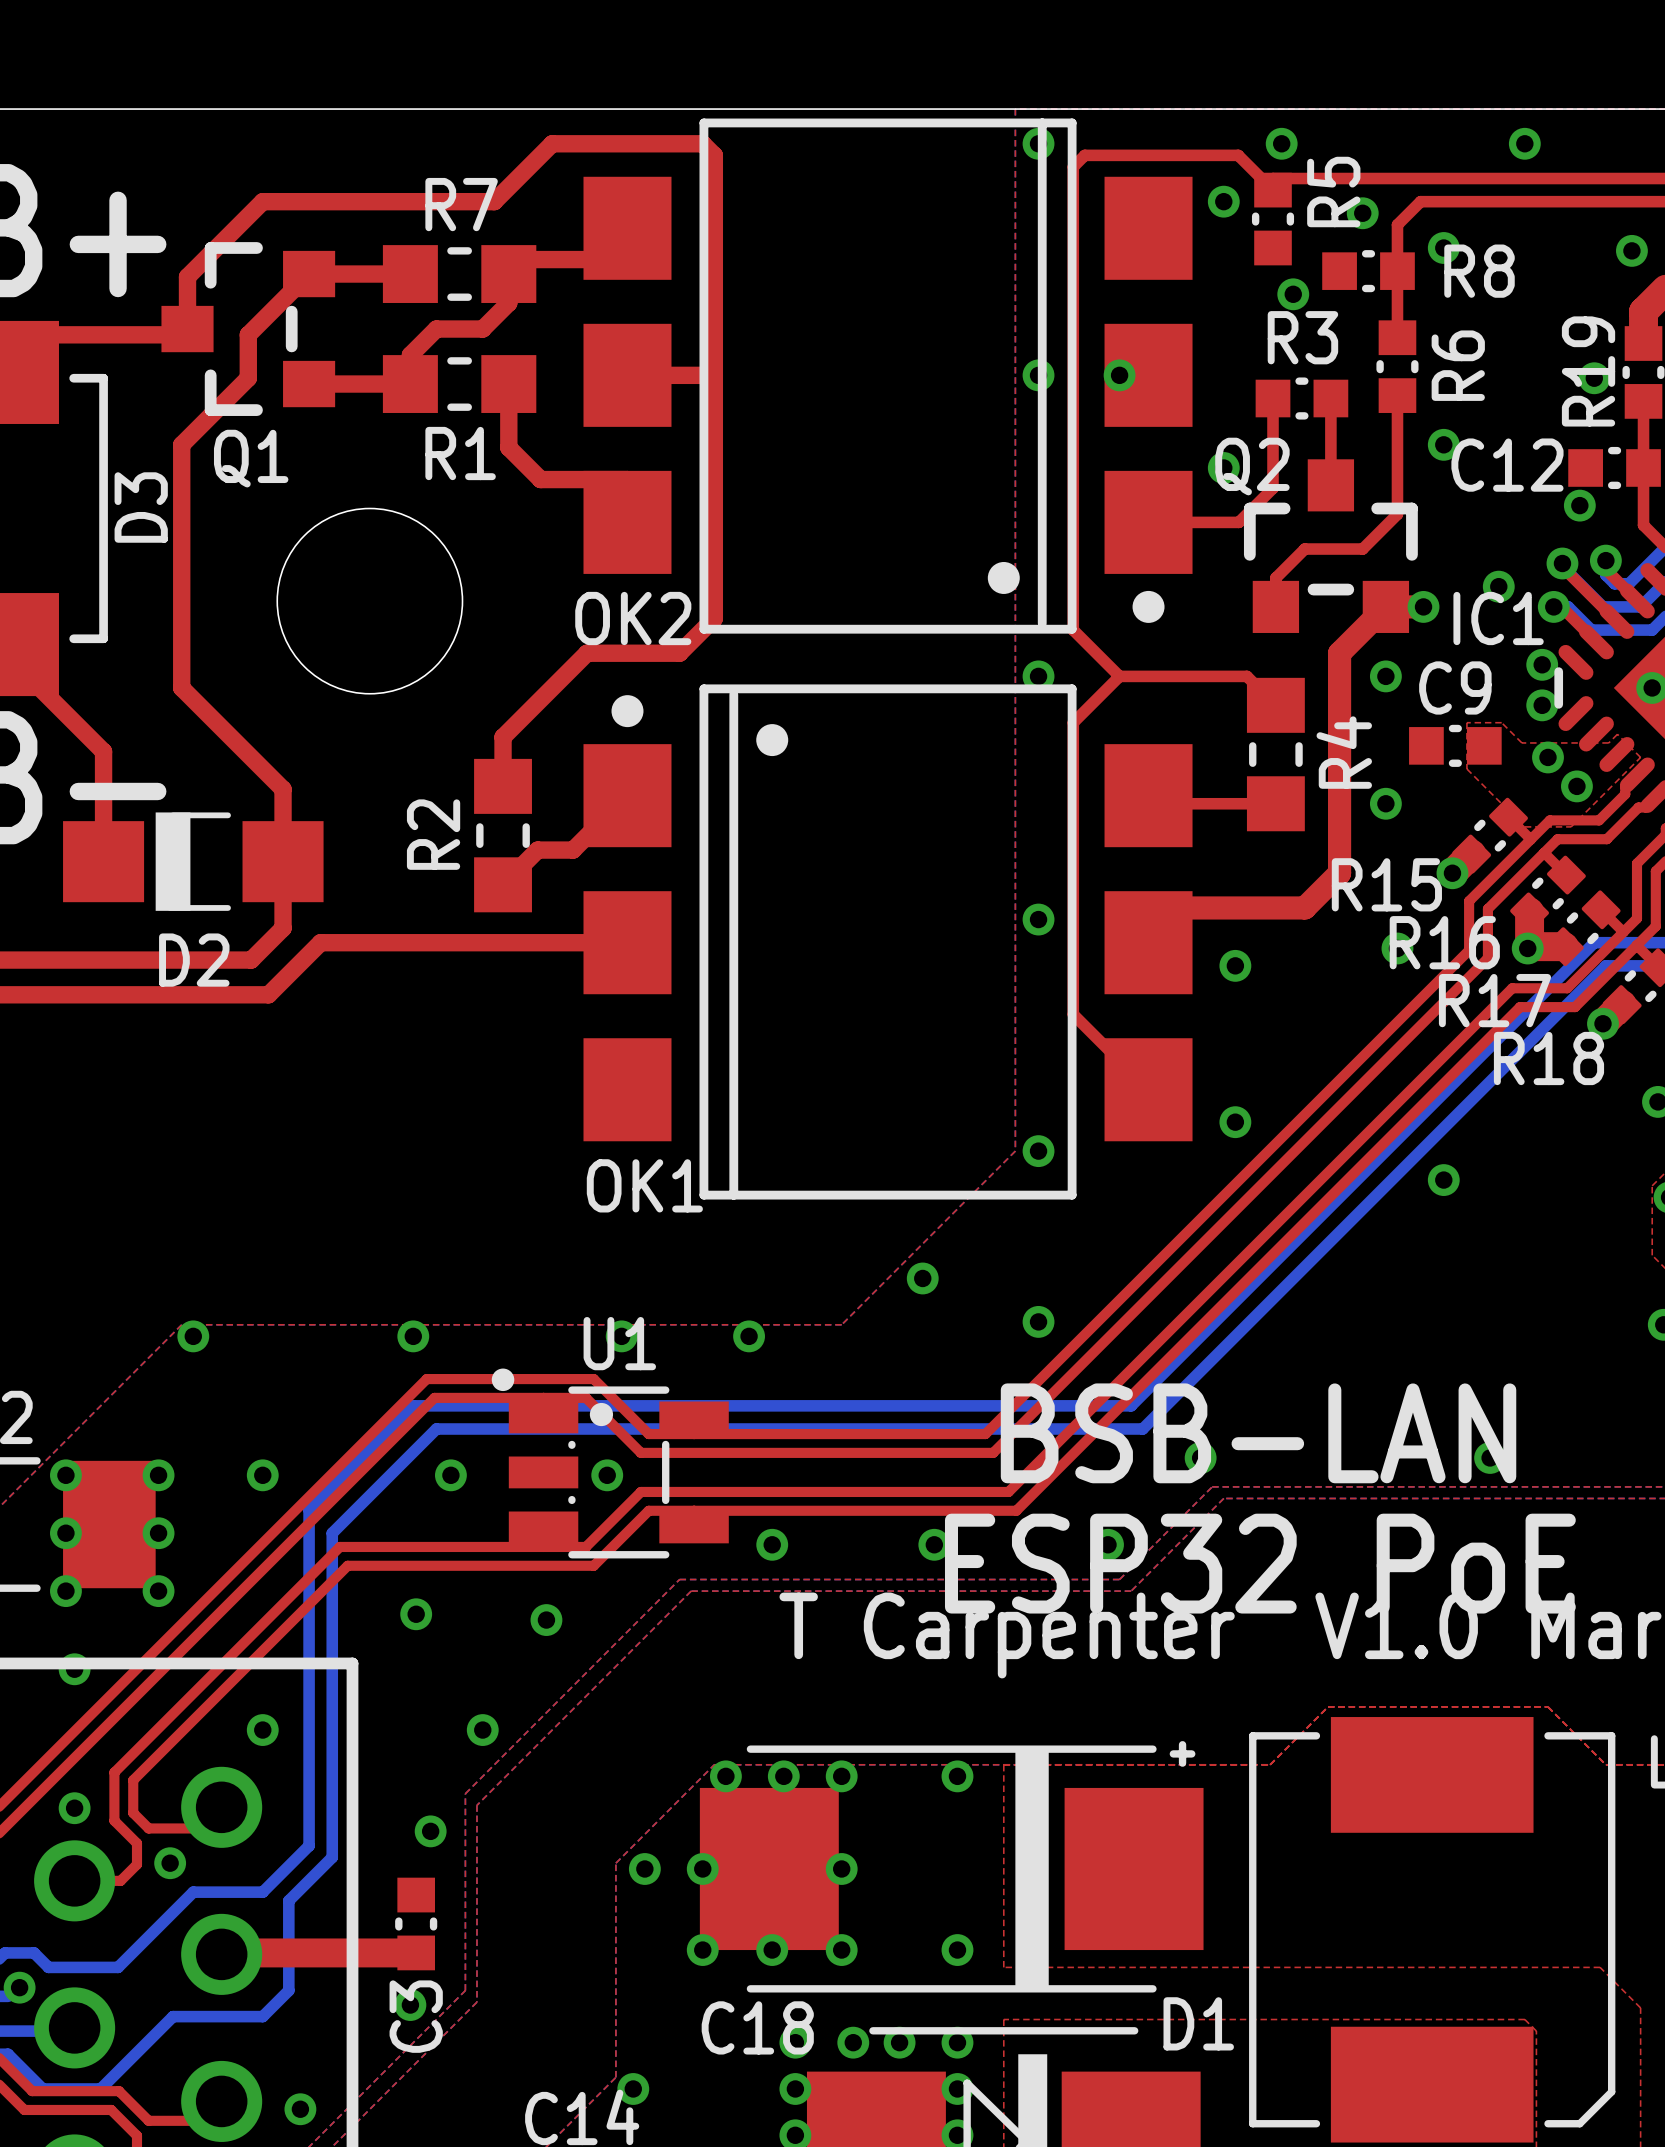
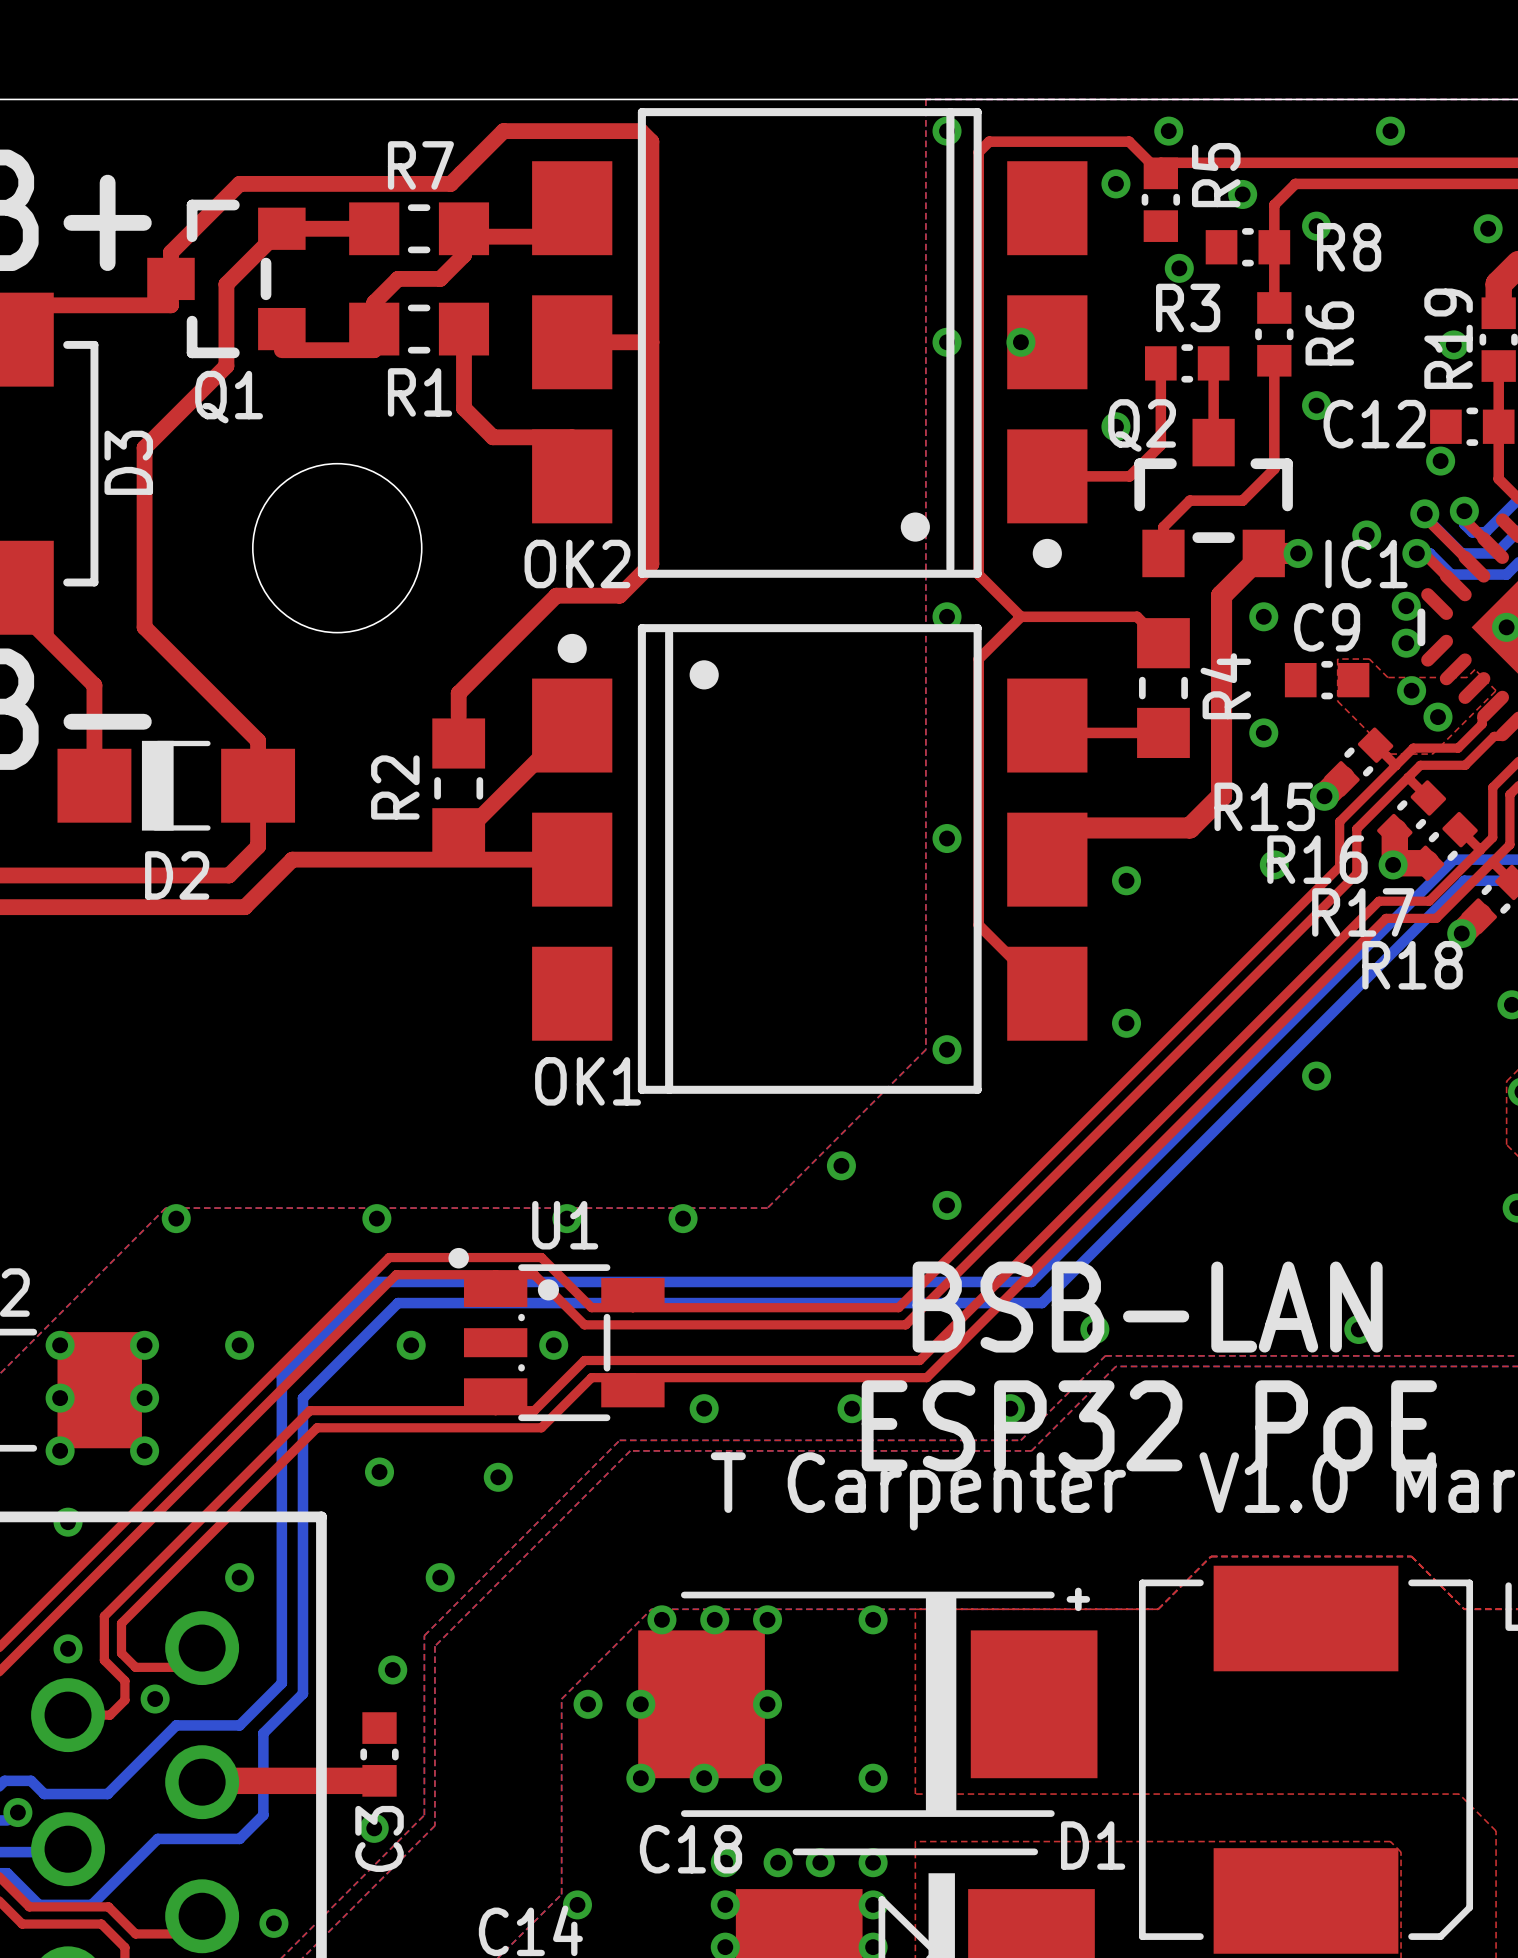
top track: (410, 274) (309, 274) (248, 334) -> (374, 228) (281, 228) (226, 284) (226, 305)
R7 position: (459, 274) -> (419, 228)
top track: (508, 279) (508, 302) (482, 329) (436, 329) (410, 355) -> (463, 255) (440, 278) (397, 278) (374, 302) (374, 323)
Q1 position: (248, 329) -> (226, 278)
top track: (248, 378) (181, 444) (181, 687) (283, 789) (283, 812) -> (226, 344) (226, 366) (144, 447) (144, 627) (258, 740)
R1 position: (459, 384) -> (419, 329)
top track: (610, 653) (586, 653) (503, 737) (503, 760) -> (556, 595) (458, 693)
R2 position: (503, 835) -> (458, 788)
top track: (573, 850) (537, 850) (503, 884) -> (522, 775) (464, 833) (458, 833)

